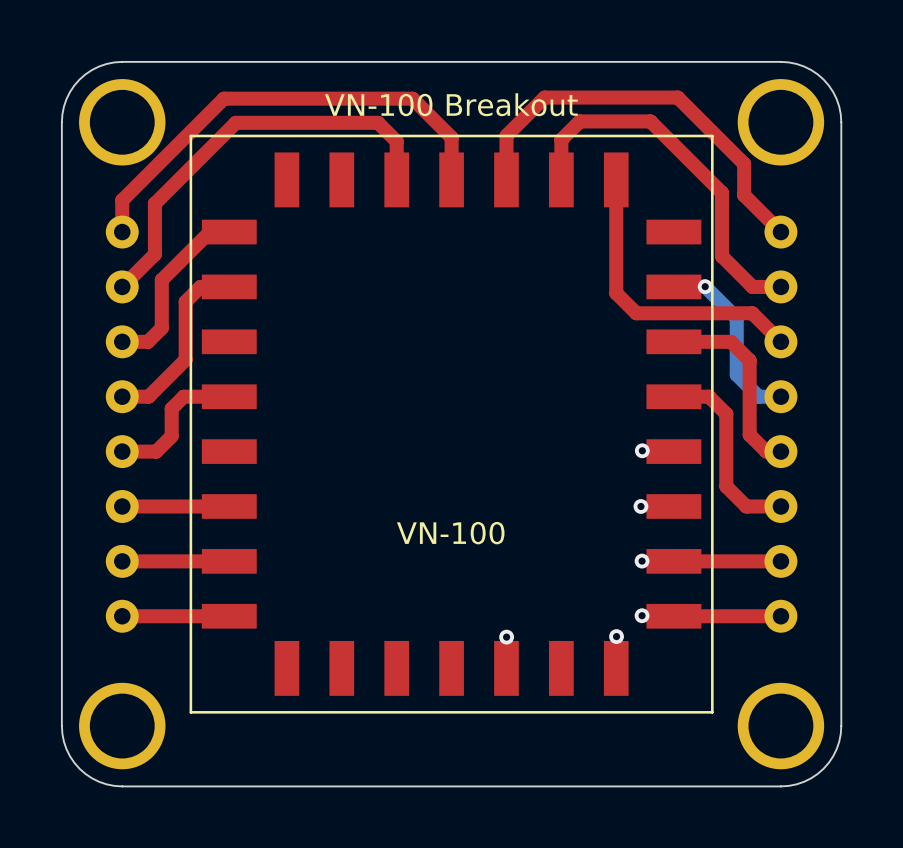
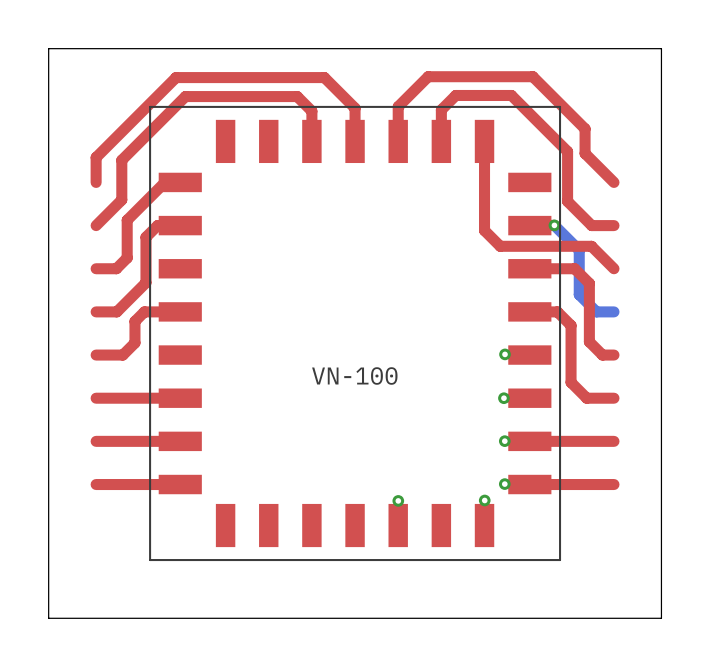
board edge: (122, 61) (99, 66) (79, 79) (66, 99) (61, 122) -> (96, 48) (48, 48) (48, 96)
board edge: (780, 61) (804, 66) (823, 79) (836, 99) (841, 122) -> (613, 48) (661, 48) (661, 96)
part: VN-100 Breakout (451, 424) -> none
part value position: VN-100 (450, 533) -> VN-100 (354, 375)
board edge: (61, 726) (66, 749) (79, 768) (99, 781) (122, 786) -> (48, 570) (48, 618) (96, 618)
board edge: (841, 726) (836, 749) (823, 768) (804, 781) (780, 786) -> (661, 570) (661, 618) (613, 618)

